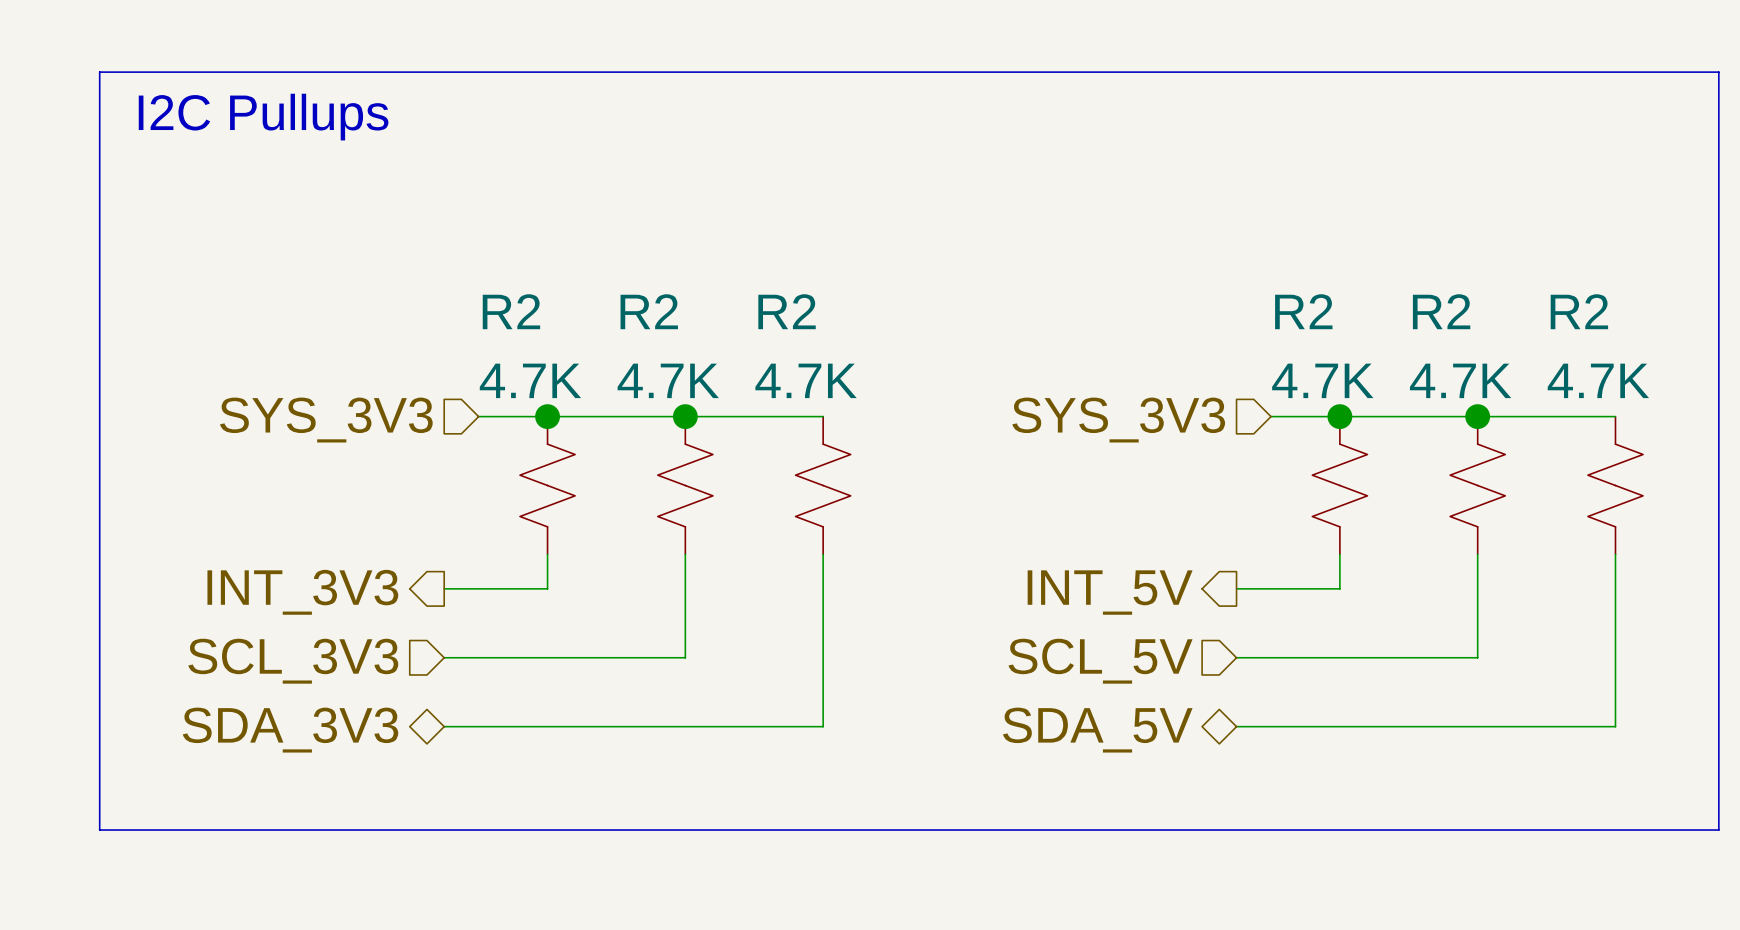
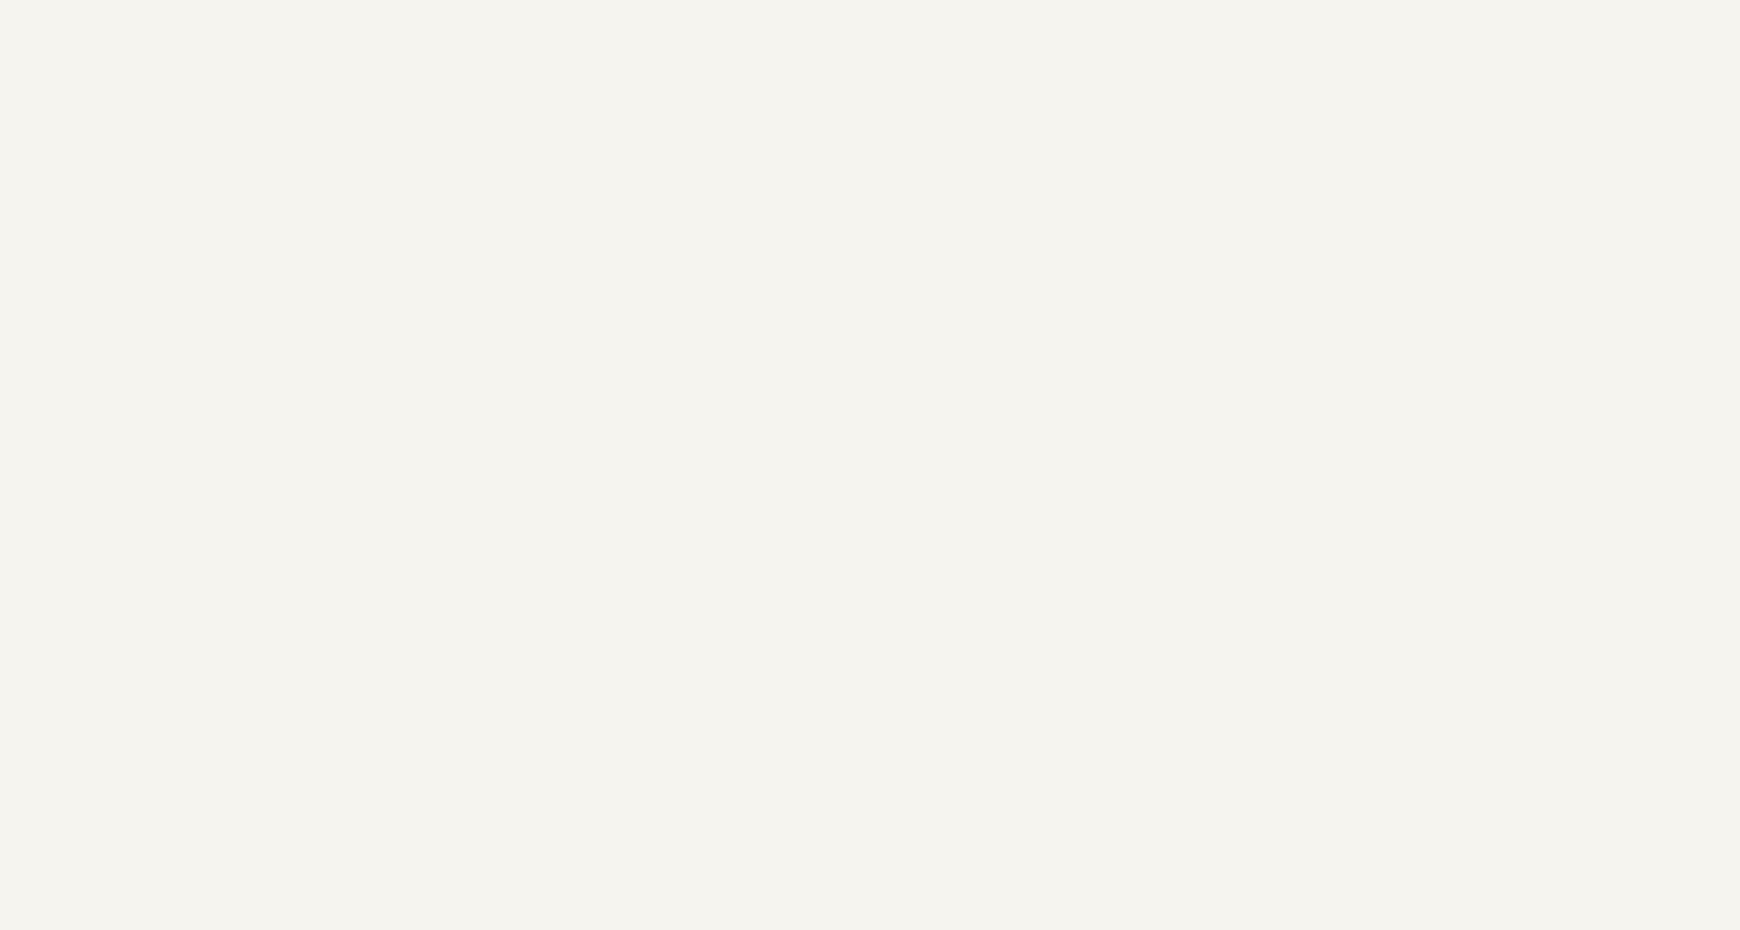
line: (99, 72) (1718, 72) (1718, 830) (99, 830) (99, 72) -> none
text: I2C Pullups (263, 117) -> none
wire: (478, 416) (823, 416) -> none
junction: (547, 416) -> none
junction: (685, 416) -> none
wire: (1270, 416) (1615, 416) -> none
junction: (1339, 416) -> none
junction: (1477, 416) -> none
hierarchical label: SYS_3V3 (326, 420) -> none
hierarchical label: SYS_3V3 (1118, 420) -> none
R2: 4.7K (547, 485) -> none
R2: 4.7K (685, 485) -> none
R2: 4.7K (823, 485) -> none
R2: 4.7K (1339, 485) -> none
R2: 4.7K (1477, 485) -> none
R2: 4.7K (1615, 485) -> none
wire: (547, 554) (547, 588) (444, 588) -> none
wire: (685, 554) (685, 657) (444, 657) -> none
wire: (823, 554) (823, 726) (444, 726) -> none
wire: (1339, 554) (1339, 588) (1236, 588) -> none
wire: (1477, 554) (1477, 657) (1236, 657) -> none
wire: (1615, 554) (1615, 726) (1236, 726) -> none
hierarchical label: INT_3V3 (302, 592) -> none
hierarchical label: INT_5V (1110, 592) -> none
hierarchical label: SCL_3V3 (293, 661) -> none
hierarchical label: SCL_5V (1100, 661) -> none
hierarchical label: SDA_3V3 (290, 730) -> none
hierarchical label: SDA_5V (1097, 730) -> none

